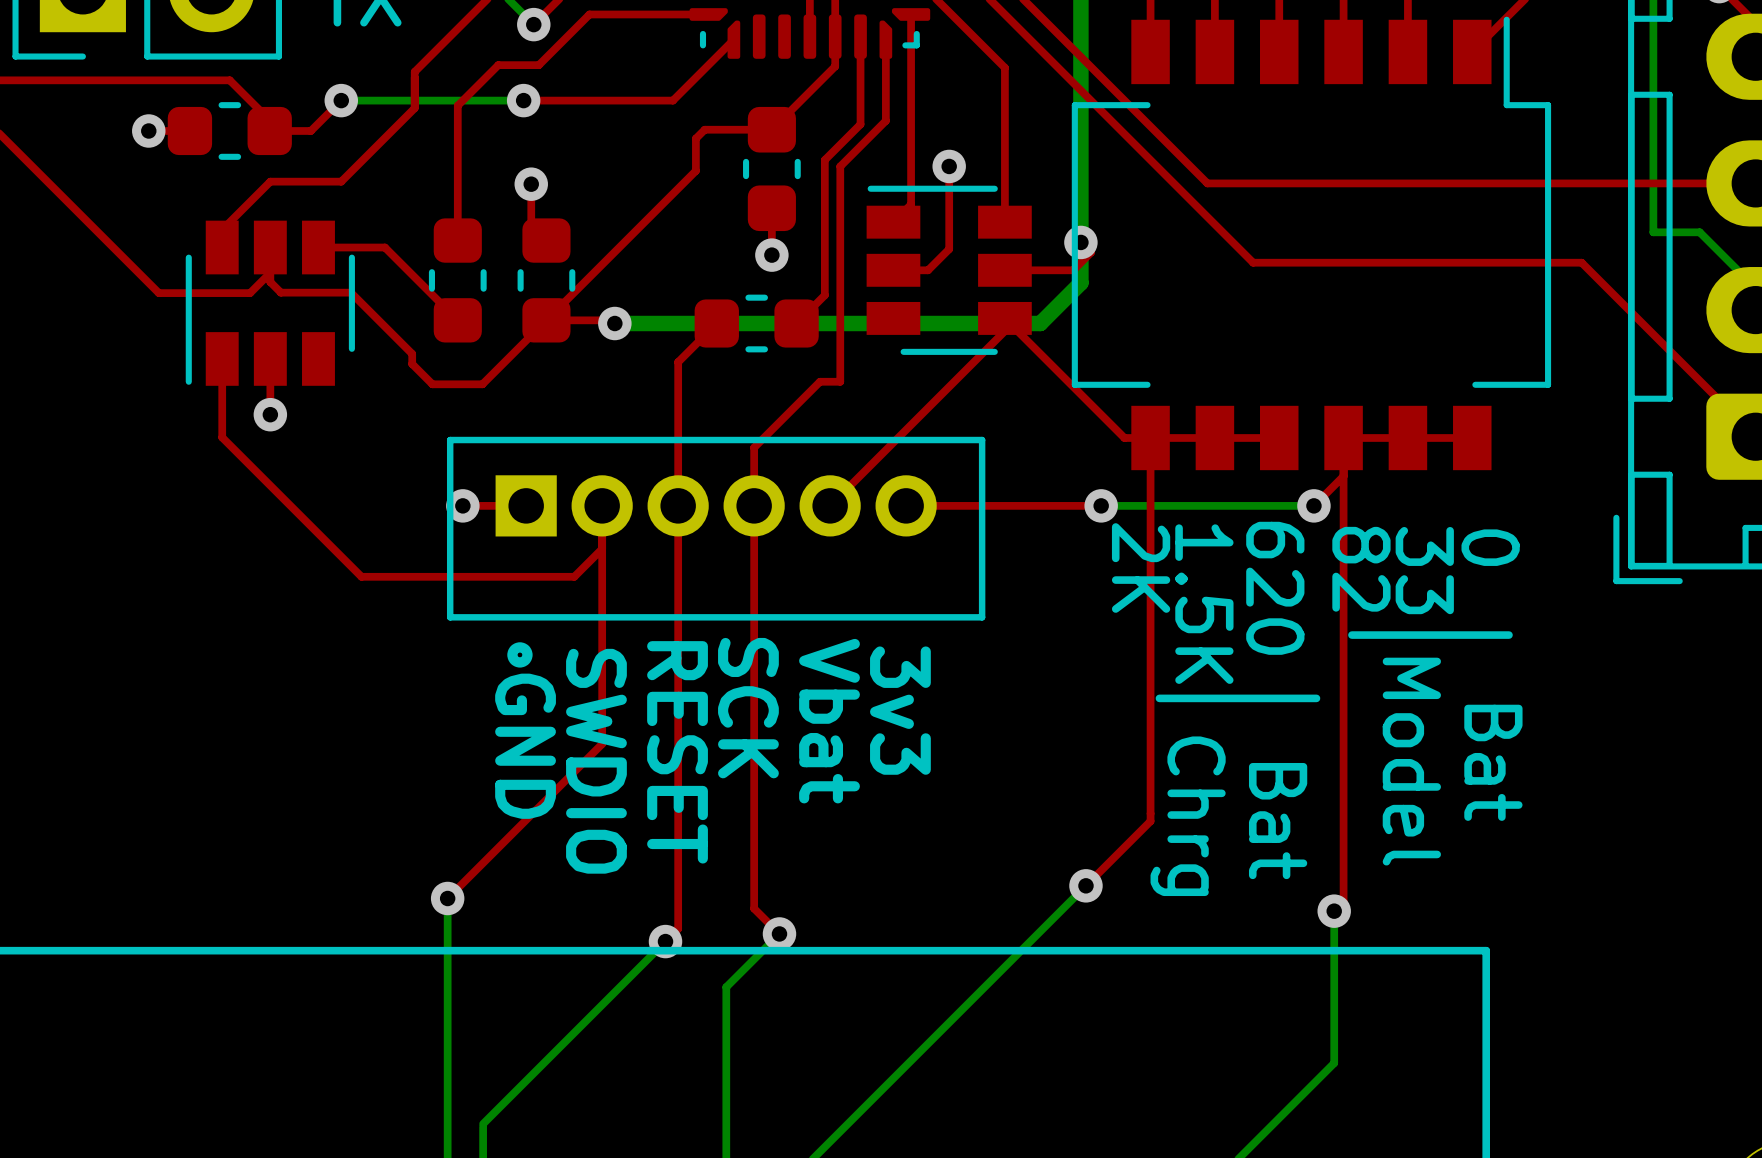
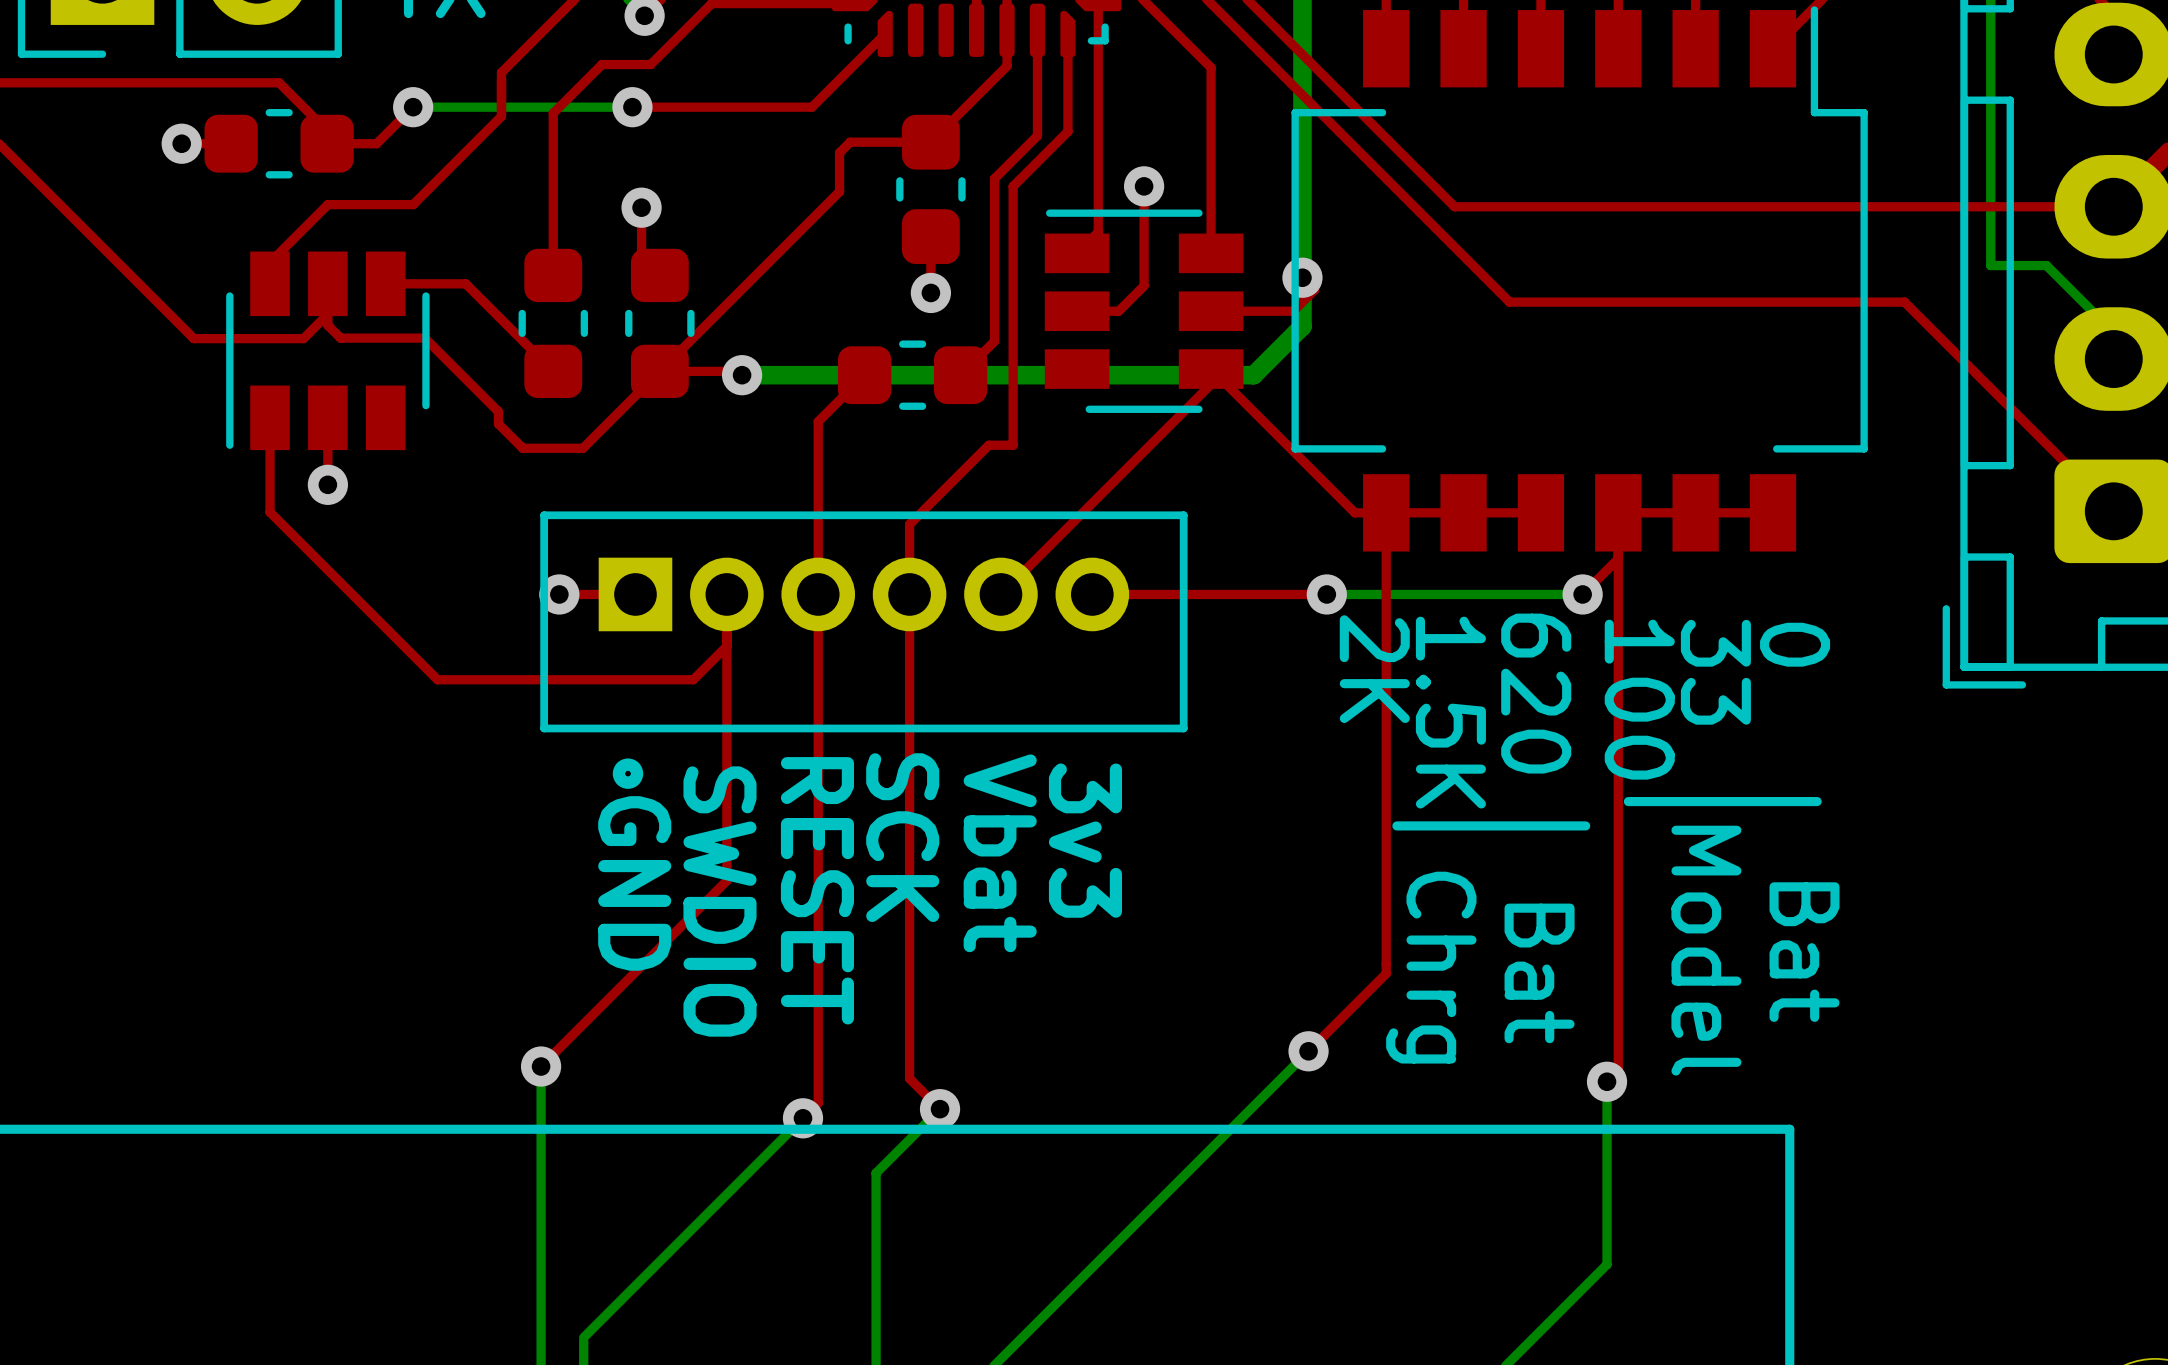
text: 82 (1361, 569) -> 100 (1639, 699)
line: (1351, 635) (1508, 635) -> (1628, 801) (1817, 801)
text position: Model (1411, 761) -> Model (1706, 950)
text position: Bat (1493, 762) -> Bat (1804, 952)

